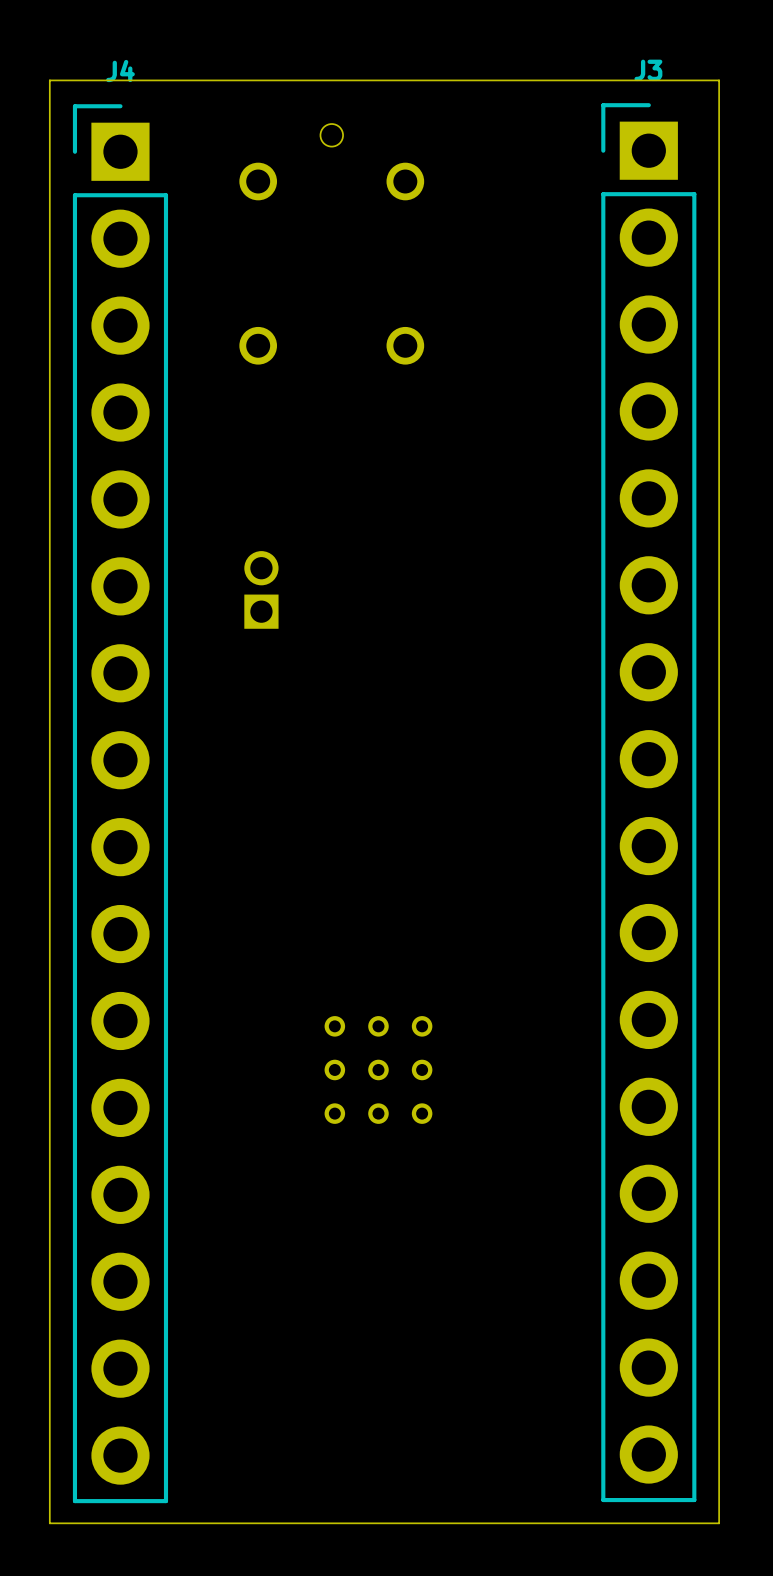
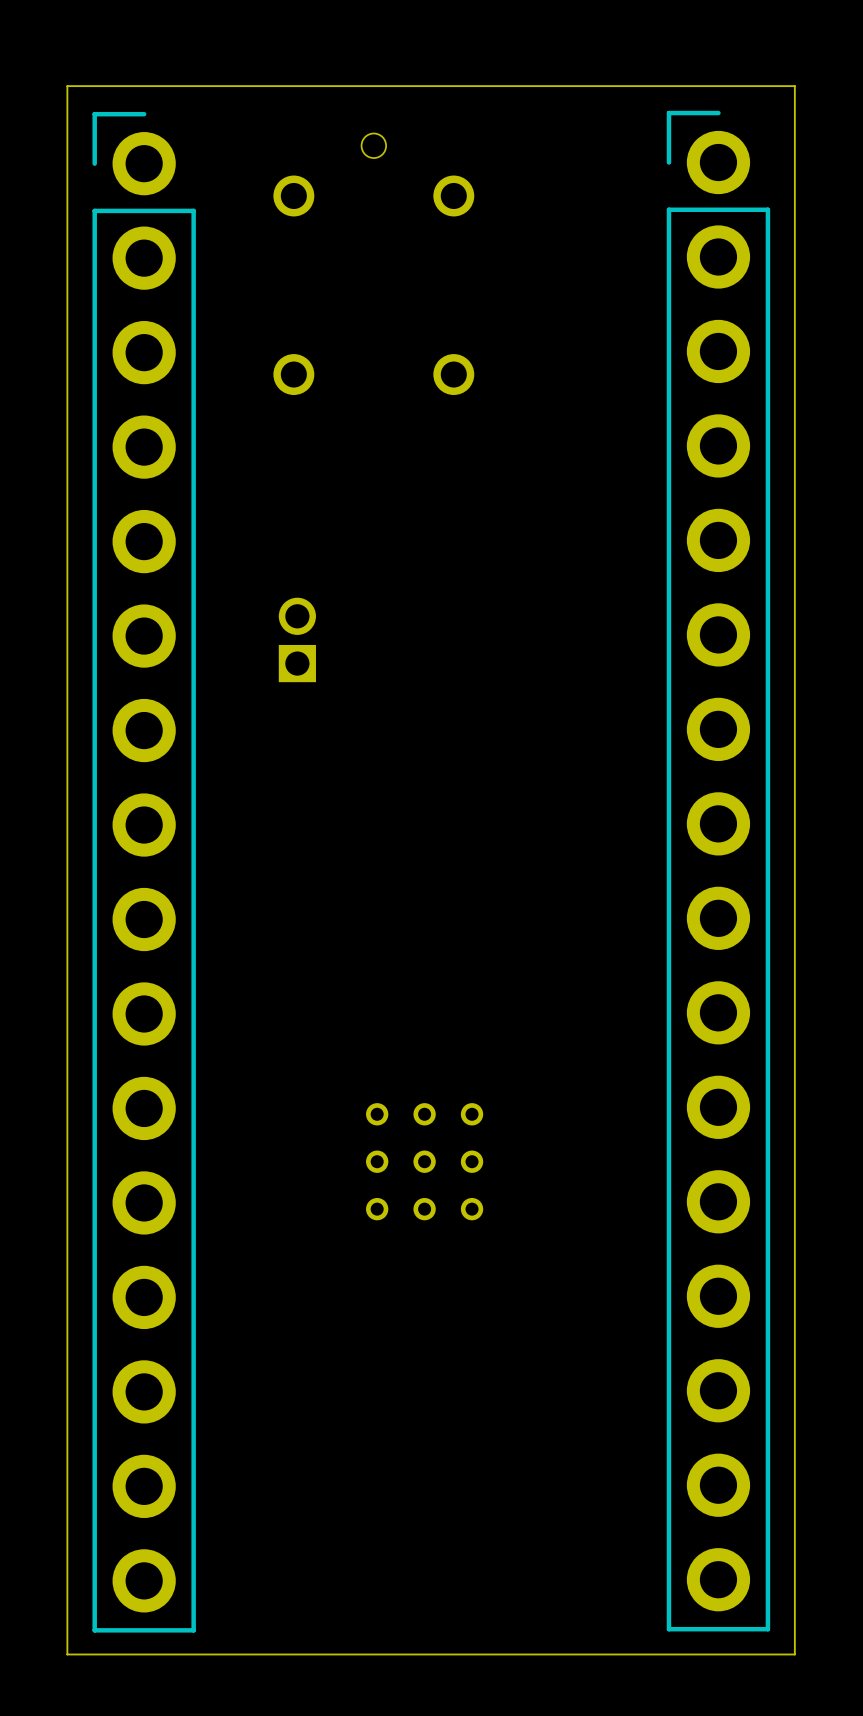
J3: (648, 802) -> none
part: none -> (718, 871)
J4: (120, 803) -> none
part: none -> (144, 872)

